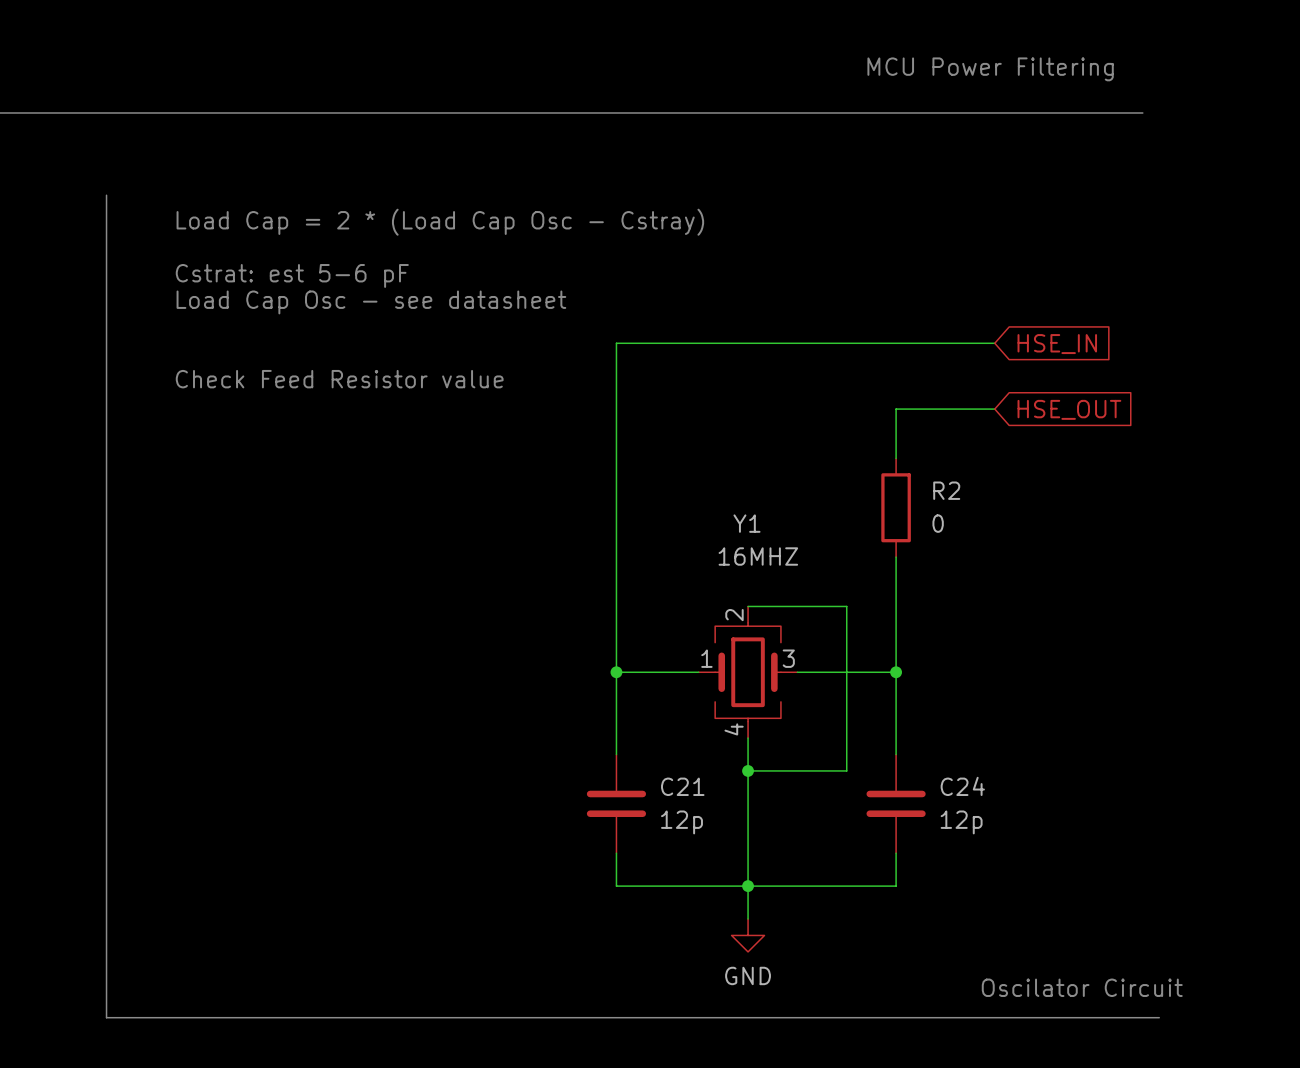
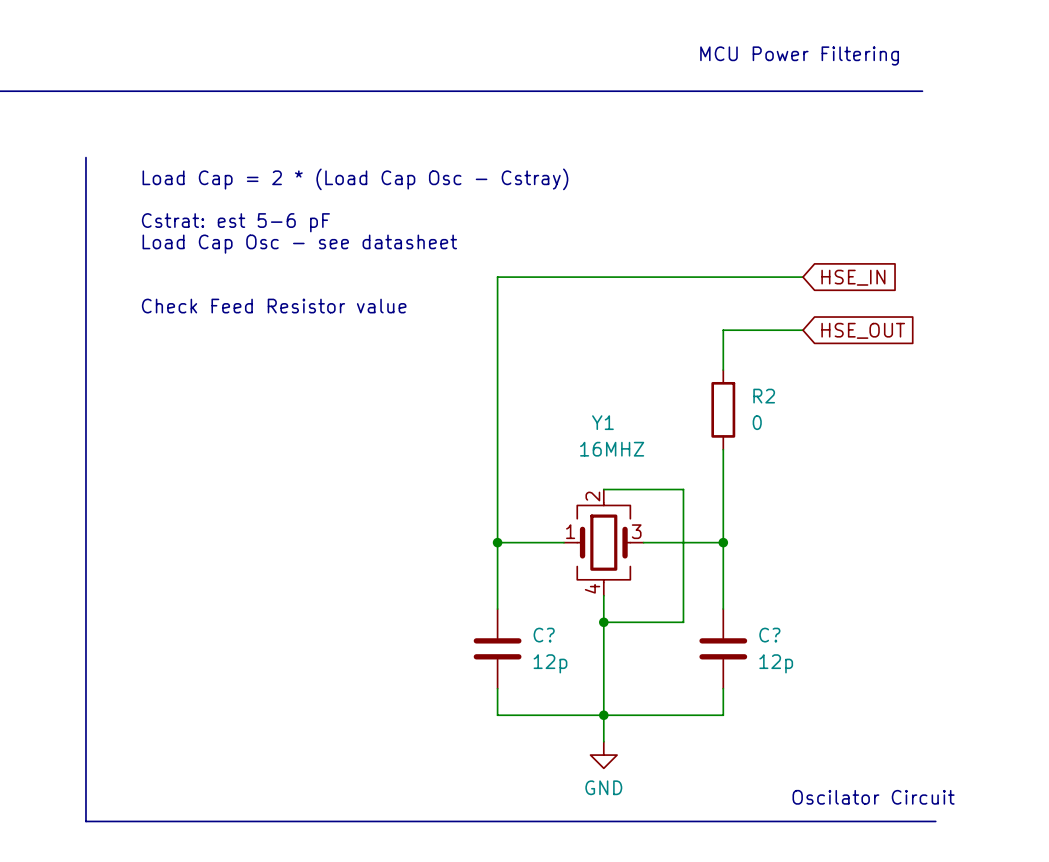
C21 name: C21 (682, 786) -> C? (544, 635)
C24 name: C24 (962, 786) -> C? (769, 635)

